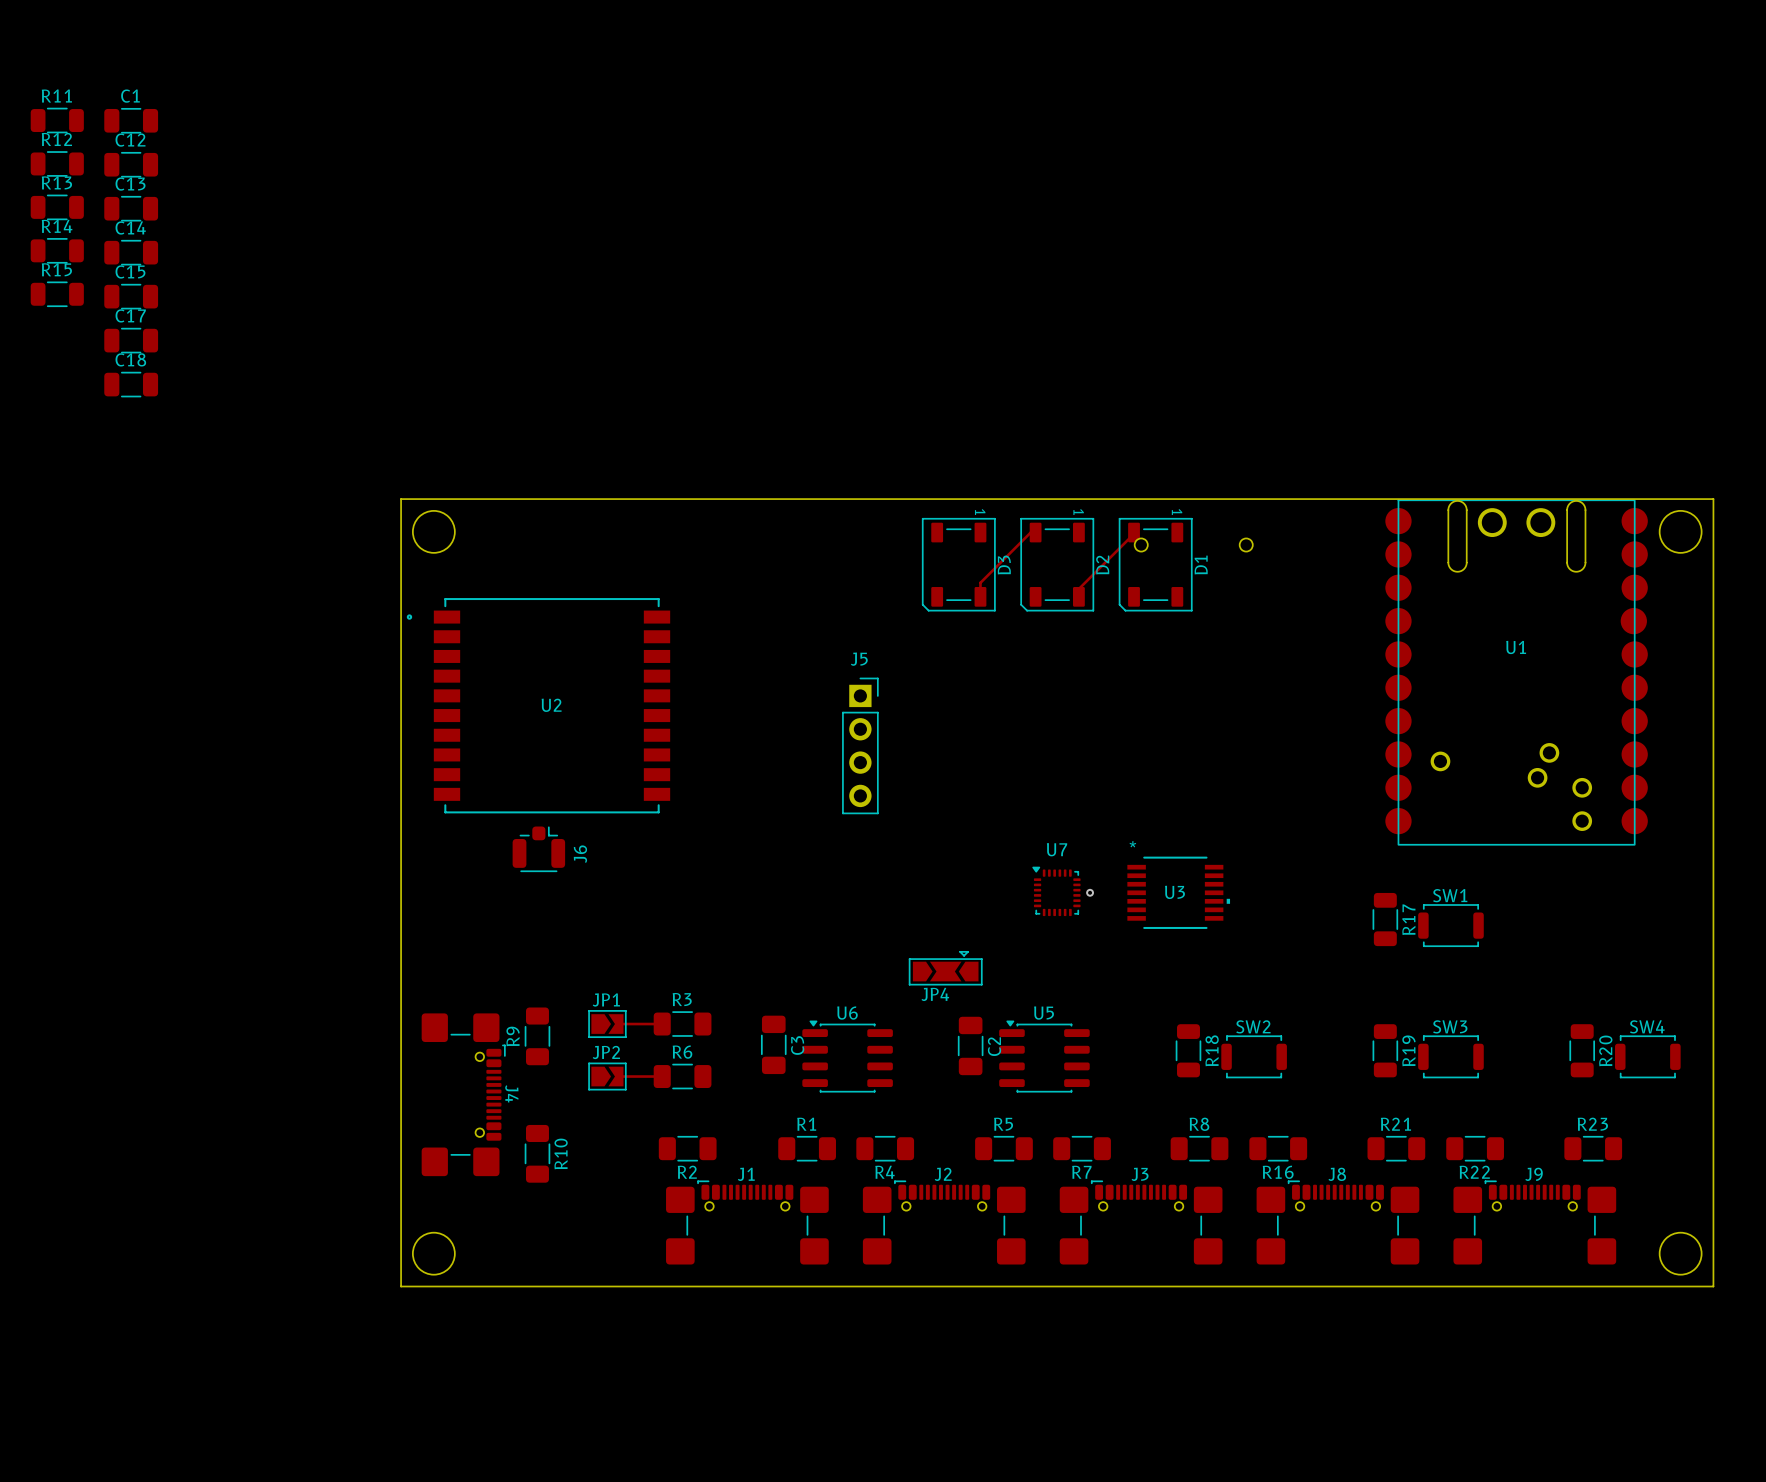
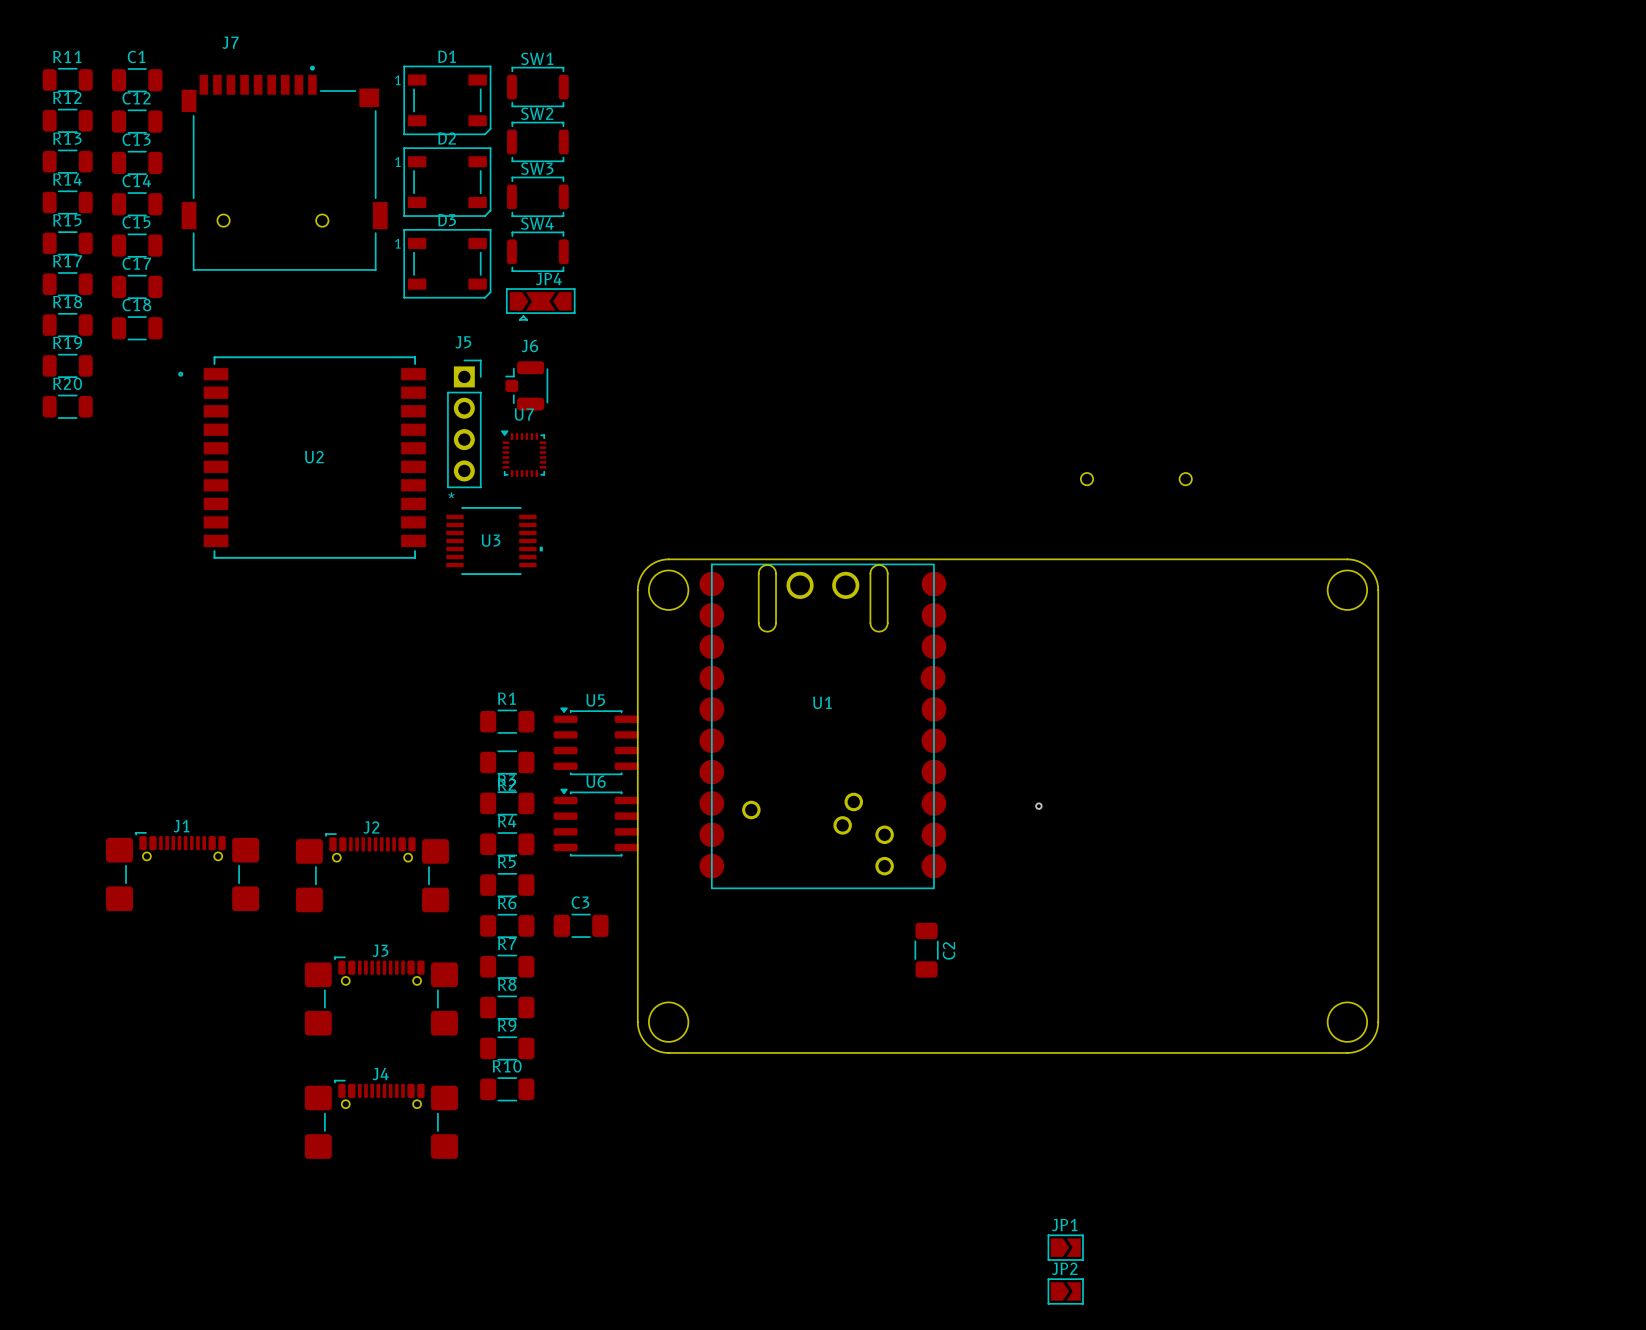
J7: none -> (284, 168)
board edge: (401, 499) (1713, 499) (1713, 1286) (401, 1286) (401, 499) -> none
round board edge position: (433, 531) -> (668, 590)
round board edge position: (1680, 531) -> (1347, 590)
track: (1035, 532) (1030, 532) (980, 582) (980, 596) -> none
track: (1134, 532) (1078, 588) (1078, 596) -> none
D3 rotation: 0° (958, 564) -> 90° counterclockwise (447, 263)
D3 position: (958, 564) -> (447, 263)
D2 rotation: 0° (1057, 564) -> 90° counterclockwise (447, 182)
D2 position: (1057, 564) -> (447, 182)
D1 rotation: 0° (1155, 564) -> 90° counterclockwise (447, 100)
D1 position: (1155, 564) -> (447, 100)
board edge: none -> (668, 559) (1347, 559) (1363, 564) (1373, 573) (1378, 590) (1378, 1022) (1373, 1038) (1363, 1048) (1347, 1052) (668, 1052) (652, 1048) (642, 1038) (637, 1022) (637, 590) (640, 576) (646, 568) (655, 562) (668, 559)
U1 position: (1516, 672) -> (822, 726)
U2 position: (538, 705) -> (302, 457)
J5 position: (860, 745) -> (464, 423)
J6 rotation: 0° (538, 849) -> 90° counterclockwise (526, 385)
J6 position: (538, 849) -> (526, 385)
U7 position: (1056, 891) -> (523, 453)
U3 position: (1178, 892) -> (494, 541)
R17 rotation: 0° (1385, 919) -> 90° clockwise (67, 284)
R17 position: (1385, 919) -> (67, 284)
R17 name position: R17 (1408, 919) -> R17 (67, 261)
SW1 position: (1450, 925) -> (537, 87)
JP4 rotation: 0° (945, 968) -> 180° (540, 304)
JP4 position: (945, 968) -> (540, 304)
JP1 position: (607, 1024) -> (1065, 1247)
track: (616, 1024) (662, 1024) -> none
R3 position: (682, 1024) -> (507, 803)
R9 rotation: 0° (537, 1036) -> 90° clockwise (507, 1048)
R9 position: (537, 1036) -> (507, 1048)
C3 rotation: 0° (773, 1044) -> 90° clockwise (581, 925)
C3 position: (773, 1044) -> (581, 925)
C3 name position: C3 (797, 1045) -> C3 (580, 902)
R18 rotation: 0° (1188, 1050) -> 90° clockwise (67, 325)
R18 position: (1188, 1050) -> (67, 325)
R18 name position: R18 (1212, 1050) -> R18 (67, 302)
R19 rotation: 0° (1385, 1050) -> 90° clockwise (67, 365)
R19 position: (1385, 1050) -> (67, 365)
R19 name position: R19 (1408, 1050) -> R19 (67, 342)
R20 rotation: 0° (1582, 1050) -> 90° clockwise (67, 406)
R20 position: (1582, 1050) -> (67, 406)
R20 name position: R20 (1605, 1050) -> R20 (67, 383)
U6 position: (847, 1056) -> (596, 822)
U5 position: (1044, 1056) -> (596, 741)
SW2 position: (1254, 1056) -> (537, 141)
SW3 position: (1450, 1056) -> (537, 196)
SW4 position: (1647, 1056) -> (537, 251)
JP2 position: (607, 1076) -> (1065, 1291)
track: (616, 1076) (662, 1076) -> none
R6 position: (682, 1076) -> (507, 925)
J4 rotation: 0° (463, 1094) -> 90° counterclockwise (381, 1119)
J4 position: (463, 1094) -> (381, 1119)
R2 position: (687, 1148) -> (507, 762)
R1 position: (807, 1148) -> (507, 721)
R4 position: (885, 1148) -> (507, 844)
R5 position: (1003, 1148) -> (507, 885)
R7 position: (1082, 1148) -> (507, 966)
R8 position: (1199, 1148) -> (507, 1007)
R16: (1278, 1148) -> none
R21: (1396, 1148) -> none
R22: (1475, 1148) -> none
R23: (1593, 1148) -> none
R10 rotation: 0° (537, 1153) -> 90° clockwise (507, 1089)
R10 position: (537, 1153) -> (507, 1089)
R10 name position: R10 (561, 1153) -> R10 (507, 1066)
R4 name position: R4 (885, 1172) -> R4 (507, 821)
R7 name position: R7 (1081, 1172) -> R7 (507, 943)
J1 position: (747, 1222) -> (182, 871)
J2 position: (944, 1222) -> (372, 872)
J3 position: (1141, 1222) -> (381, 996)
J8: (1337, 1222) -> none
J9: (1534, 1222) -> none
round board edge position: (433, 1253) -> (668, 1022)
round board edge position: (1680, 1253) -> (1347, 1022)

